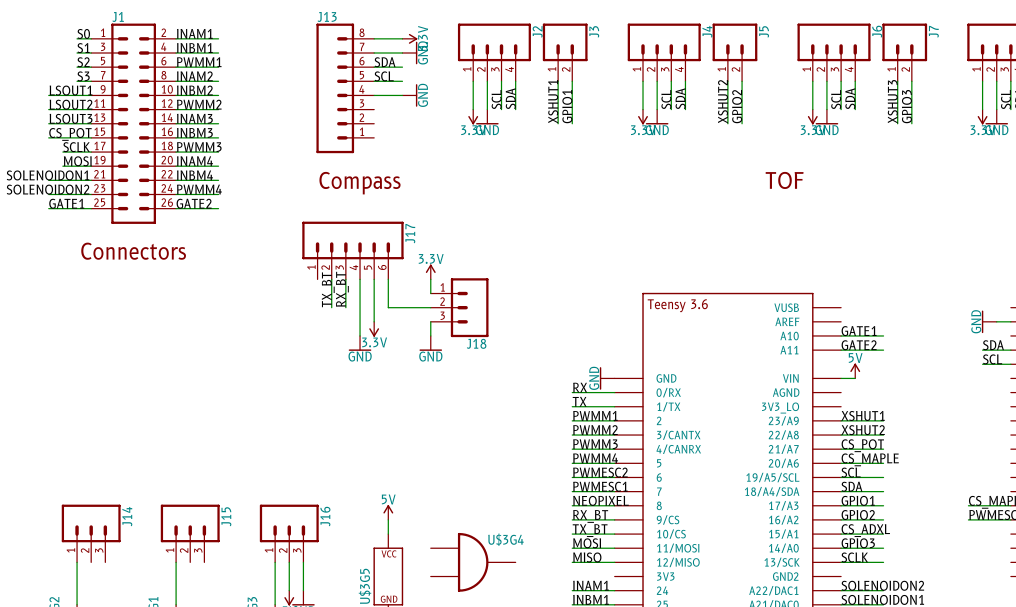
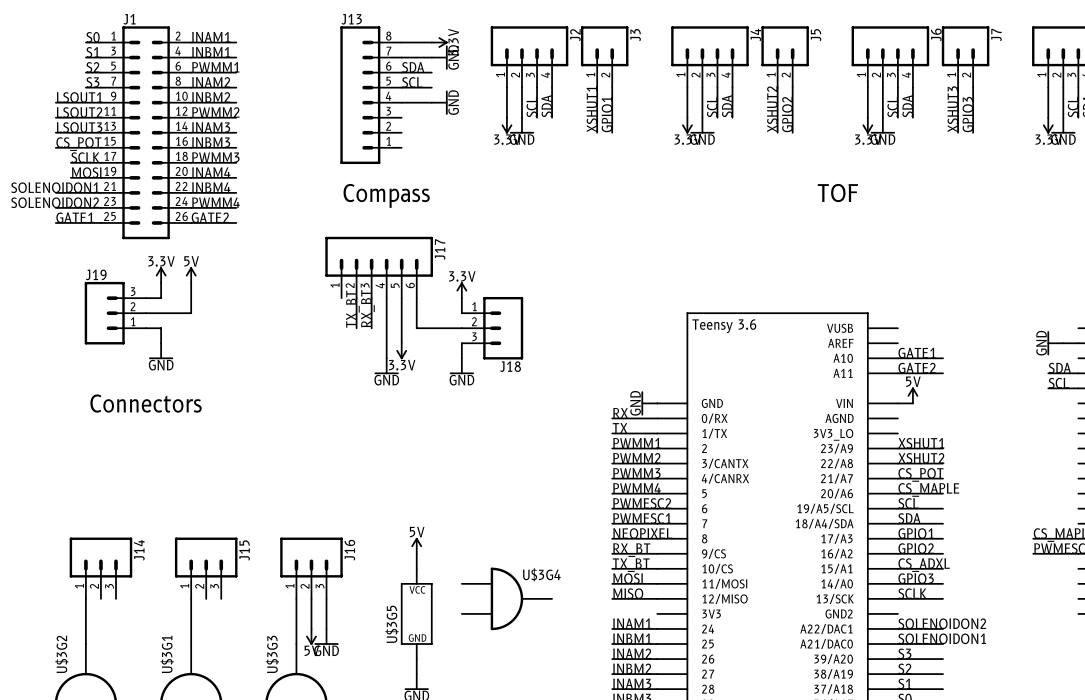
text position: Connectors (133, 251) -> Connectors (146, 403)
power symbol: none -> 3.3V (161, 275)
power symbol: none -> 5V (191, 275)
wire: none -> (161, 283) (161, 298) (146, 298)
wire: none -> (191, 283) (191, 313) (146, 313)
J19: none -> (115, 313)
wire: none -> (146, 328) (161, 328) (161, 343)
power symbol: none -> GND (161, 351)

